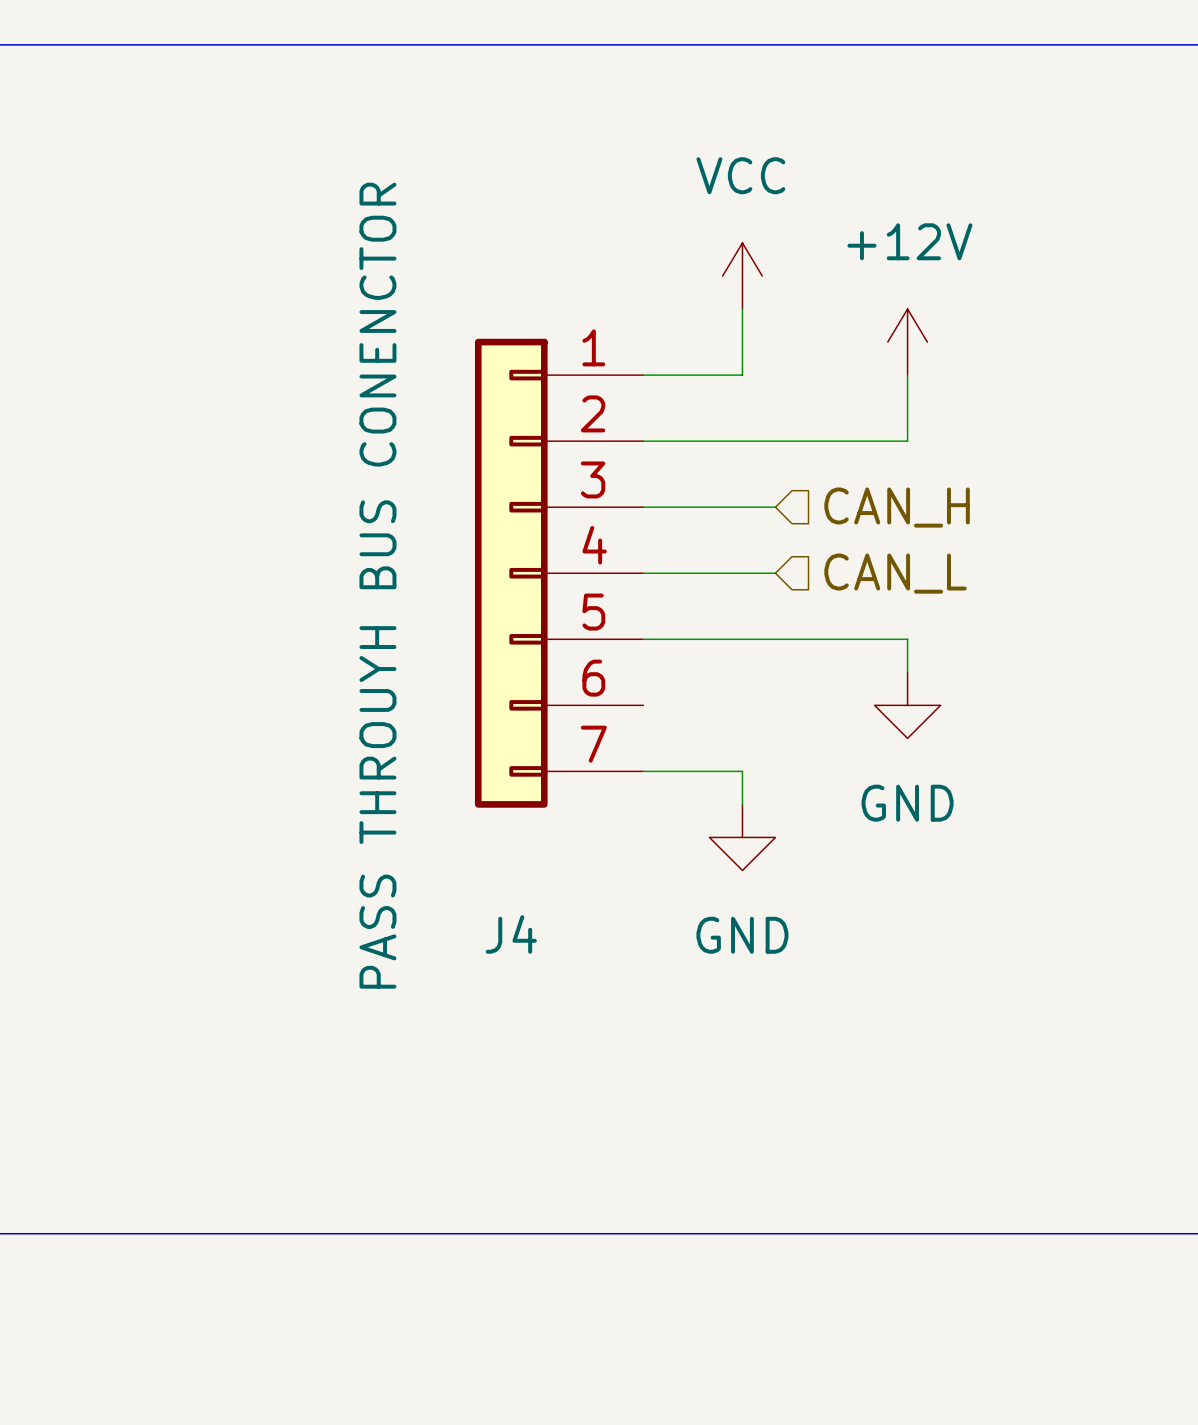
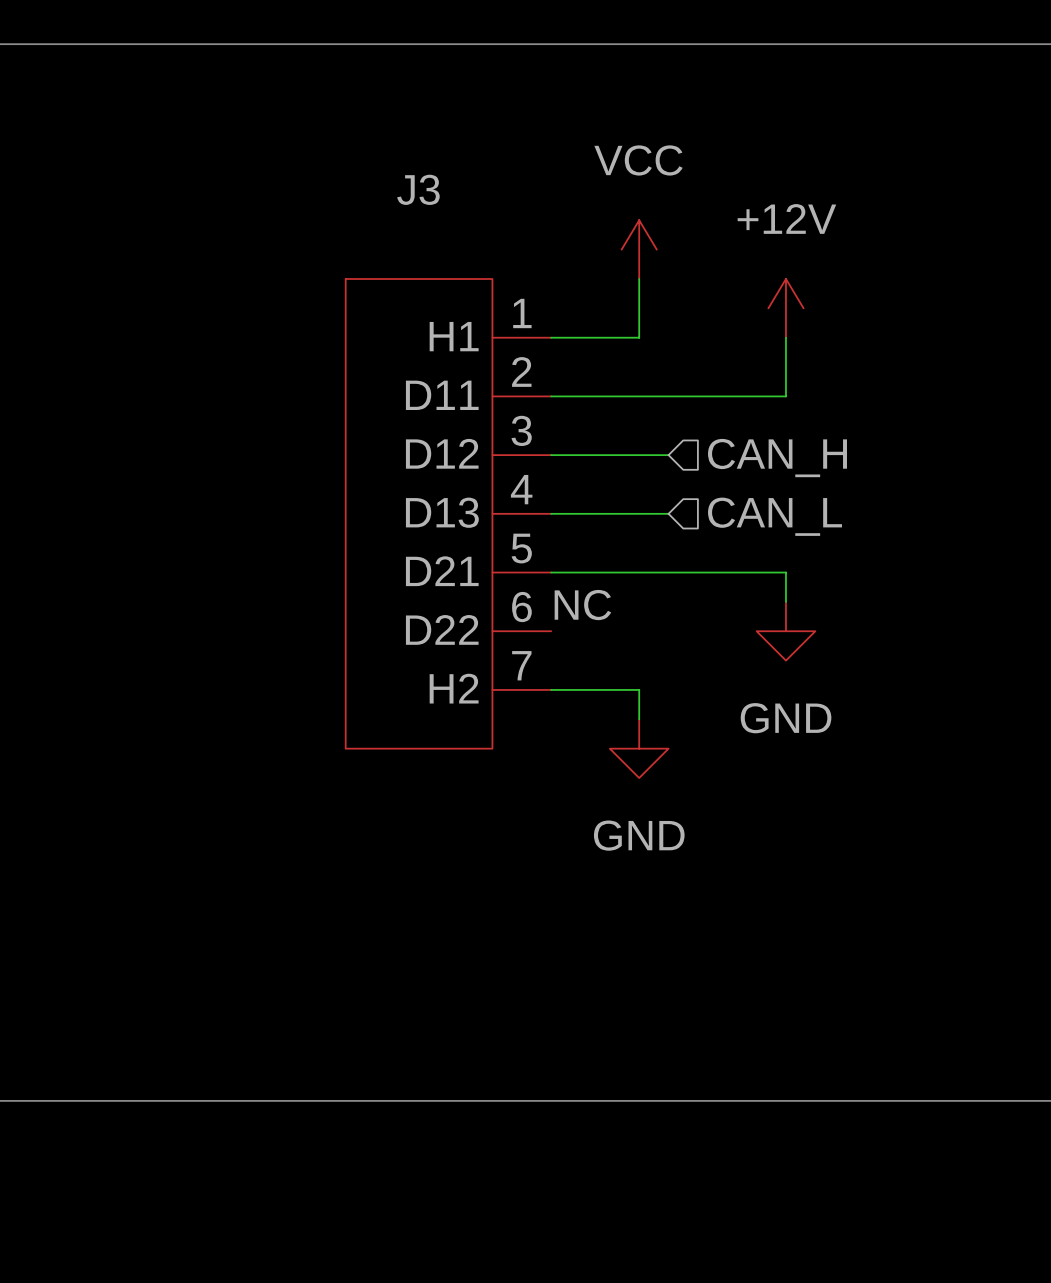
J3: none -> (448, 513)
J4: PASS THROUYH BUS CONENCTOR (559, 573) -> none
label: none -> NC (582, 605)

